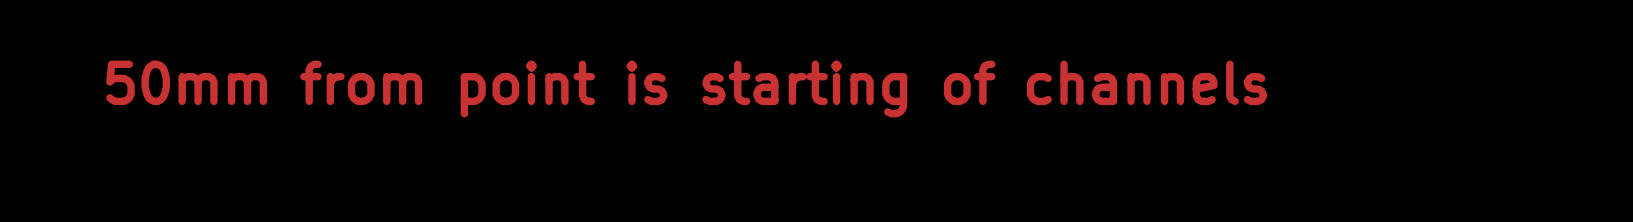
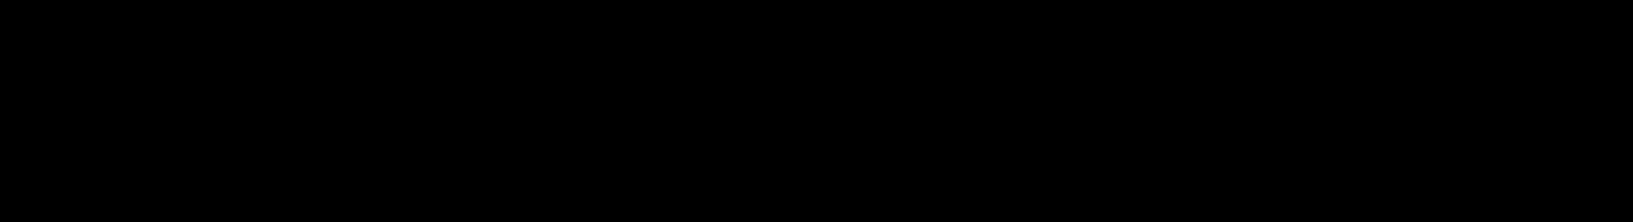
text: 50mm from point is starting of channels (686, 89) -> none

